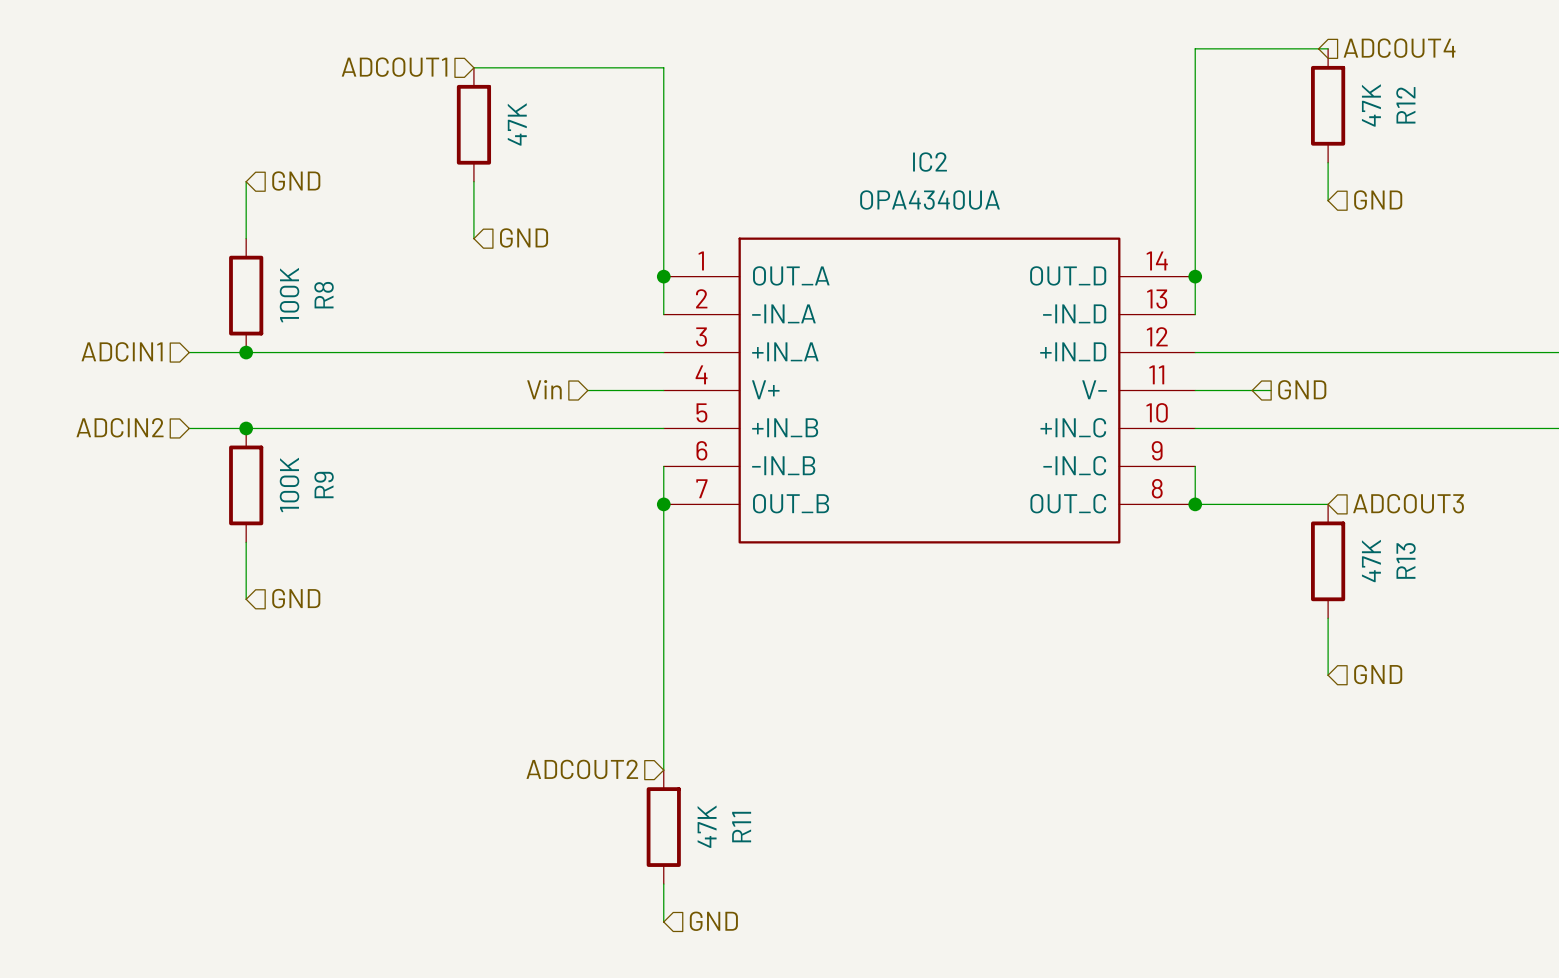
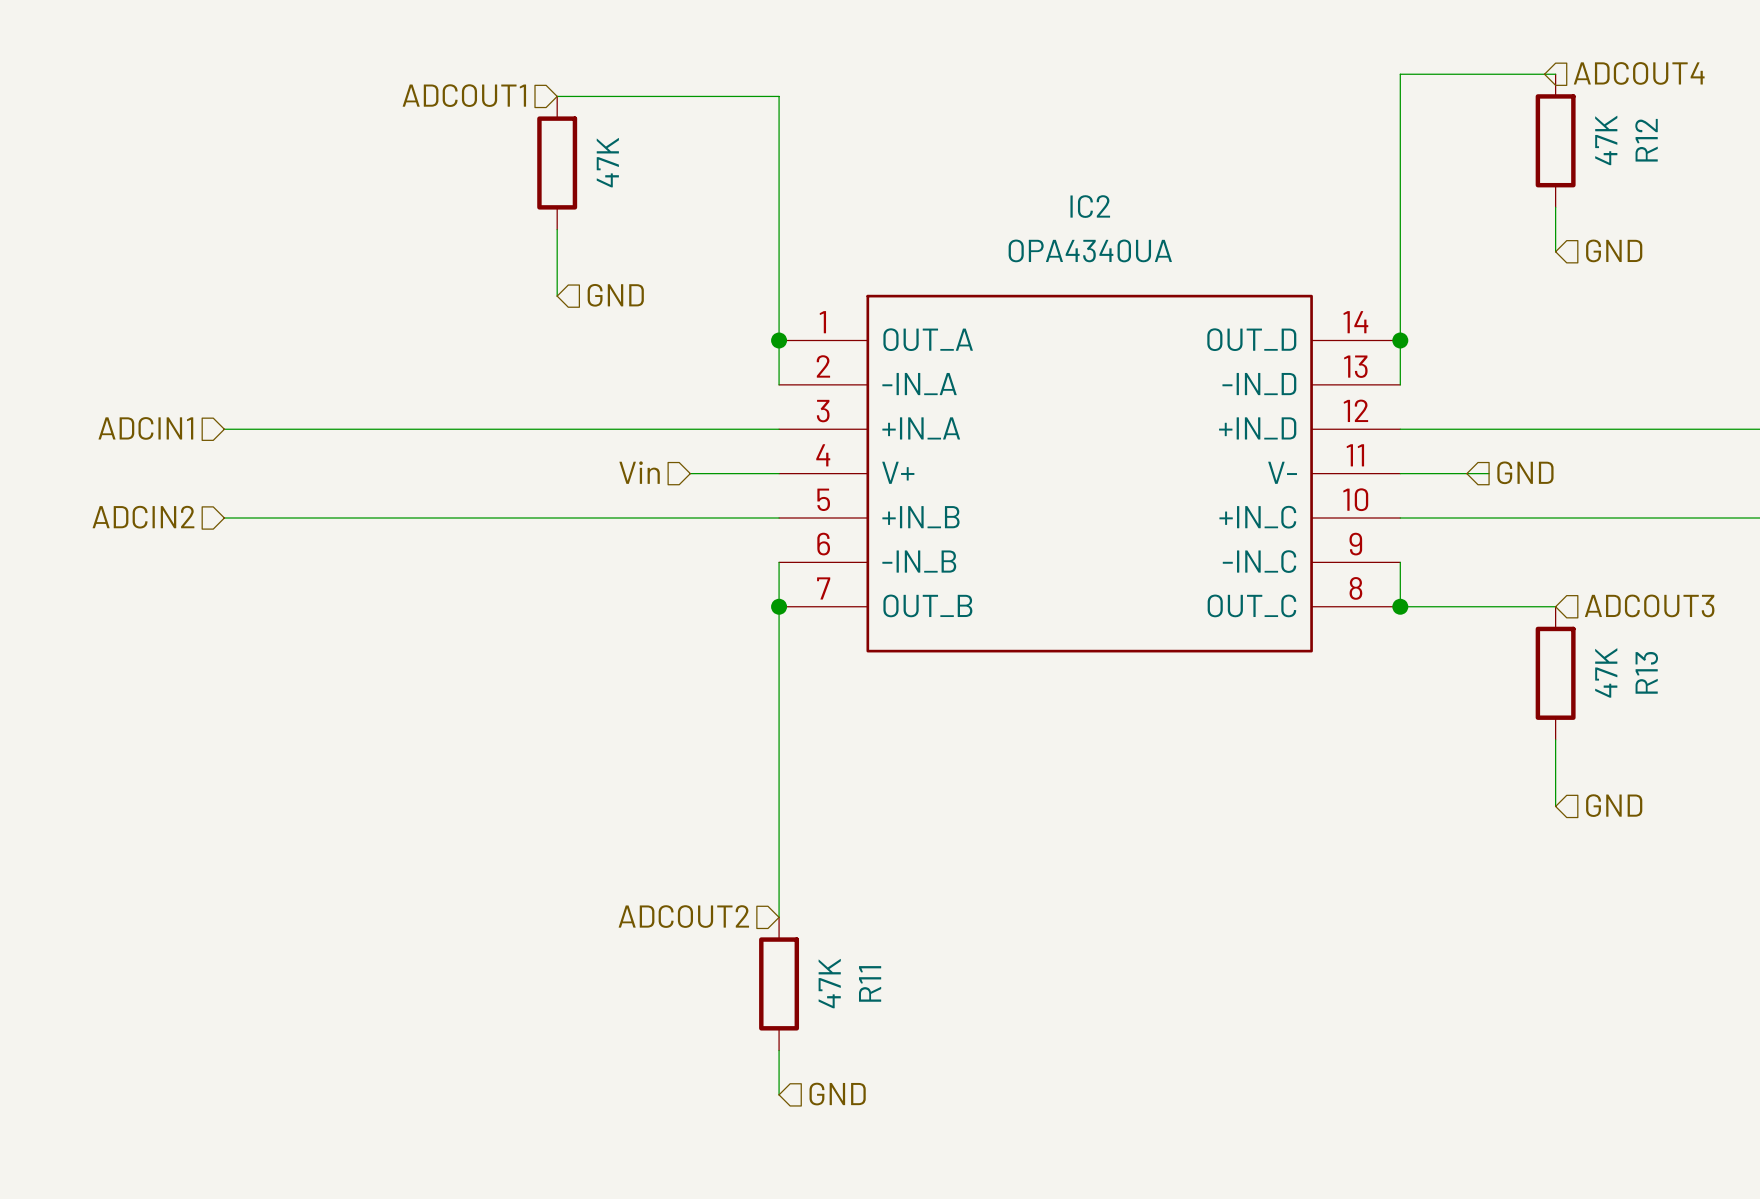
wire: (246, 181) (246, 238) -> none
hierarchical label: GND (296, 181) -> none
R8: 100K (246, 295) -> none
junction: (246, 352) -> none
junction: (246, 428) -> none
R9: 100K (246, 485) -> none
wire: (246, 542) (246, 599) -> none
hierarchical label: GND (296, 598) -> none

